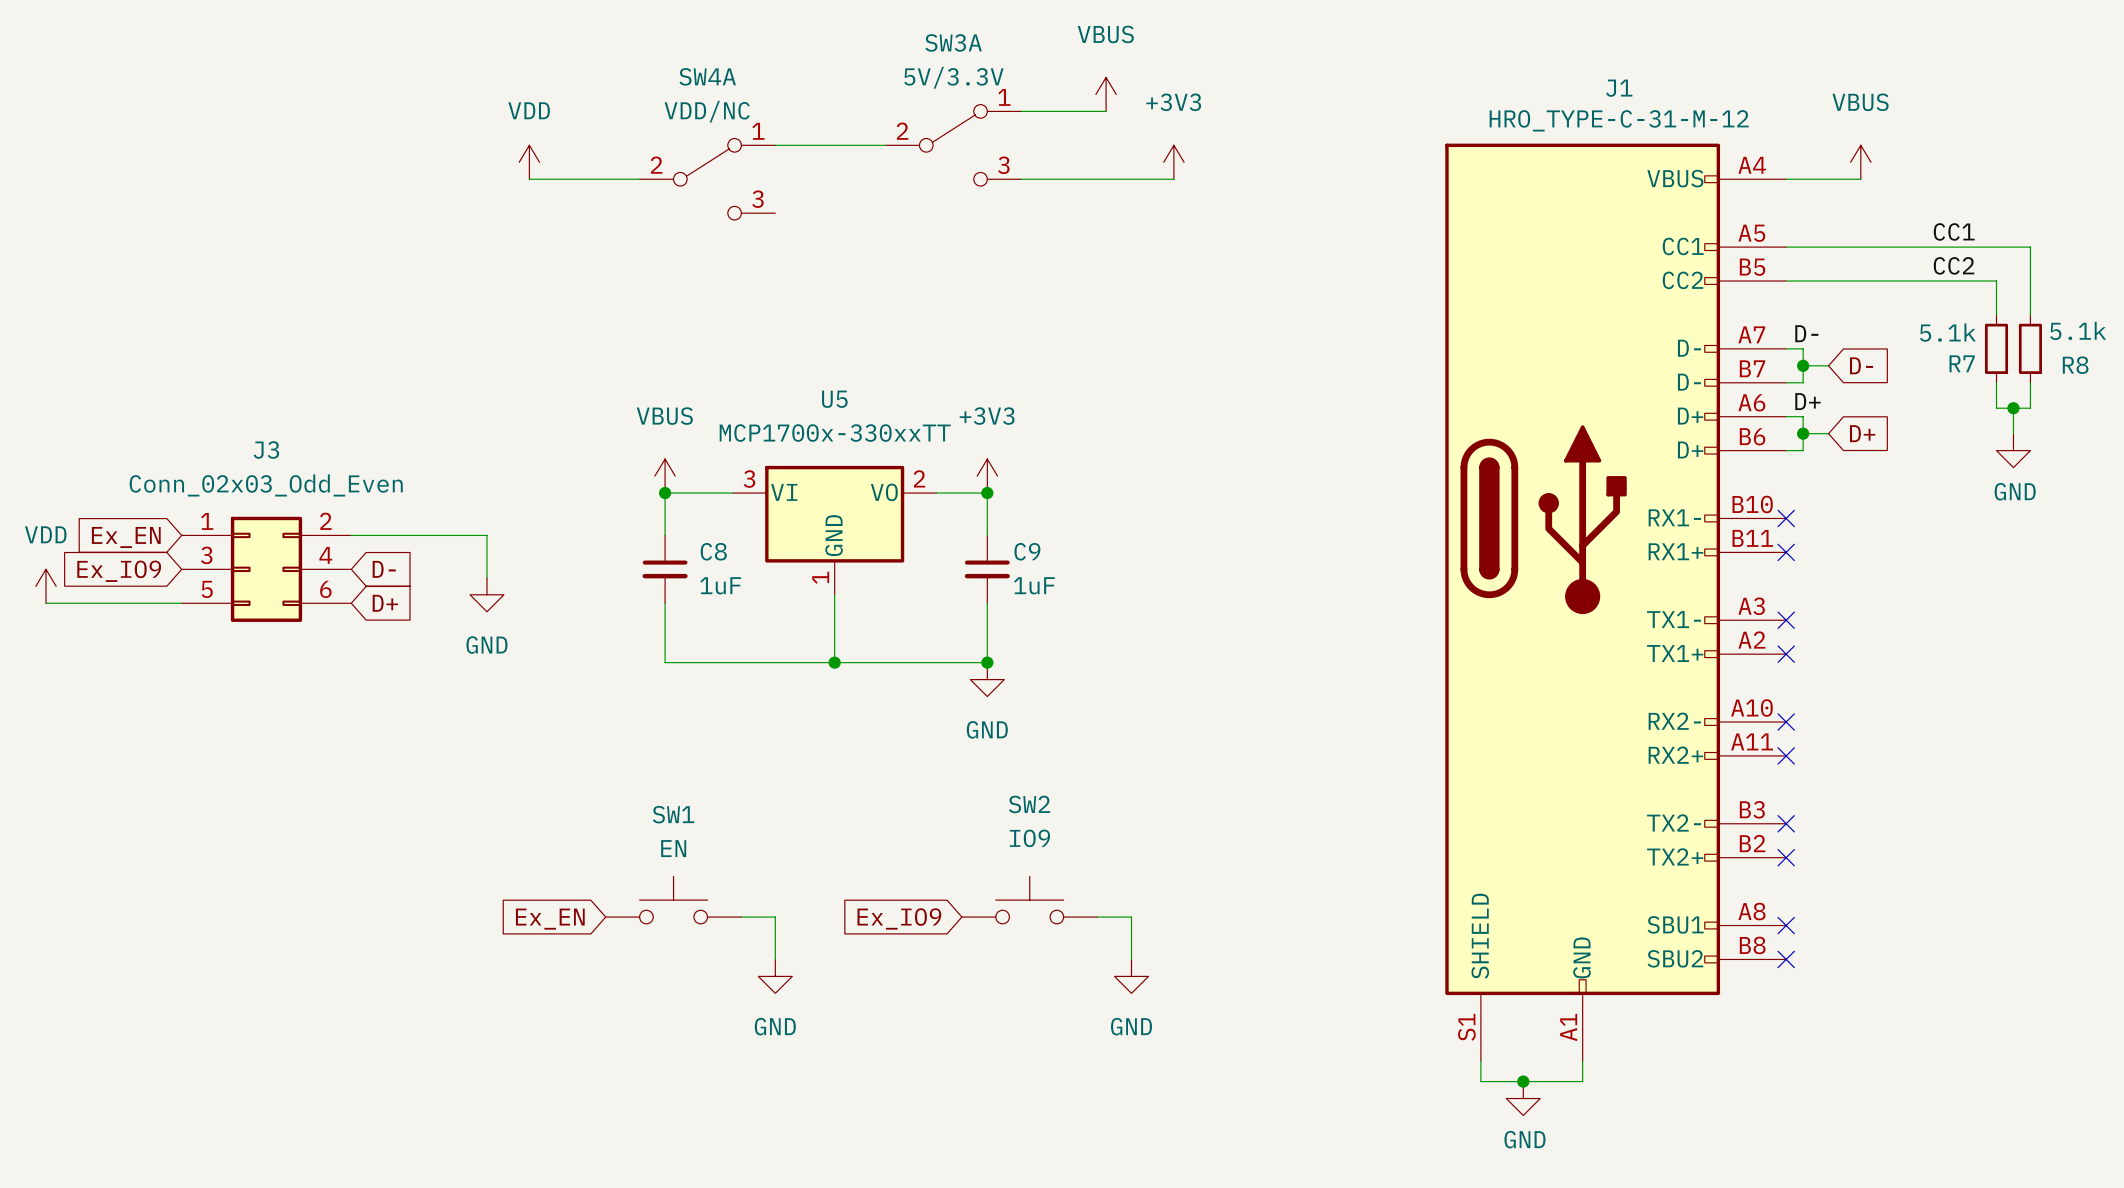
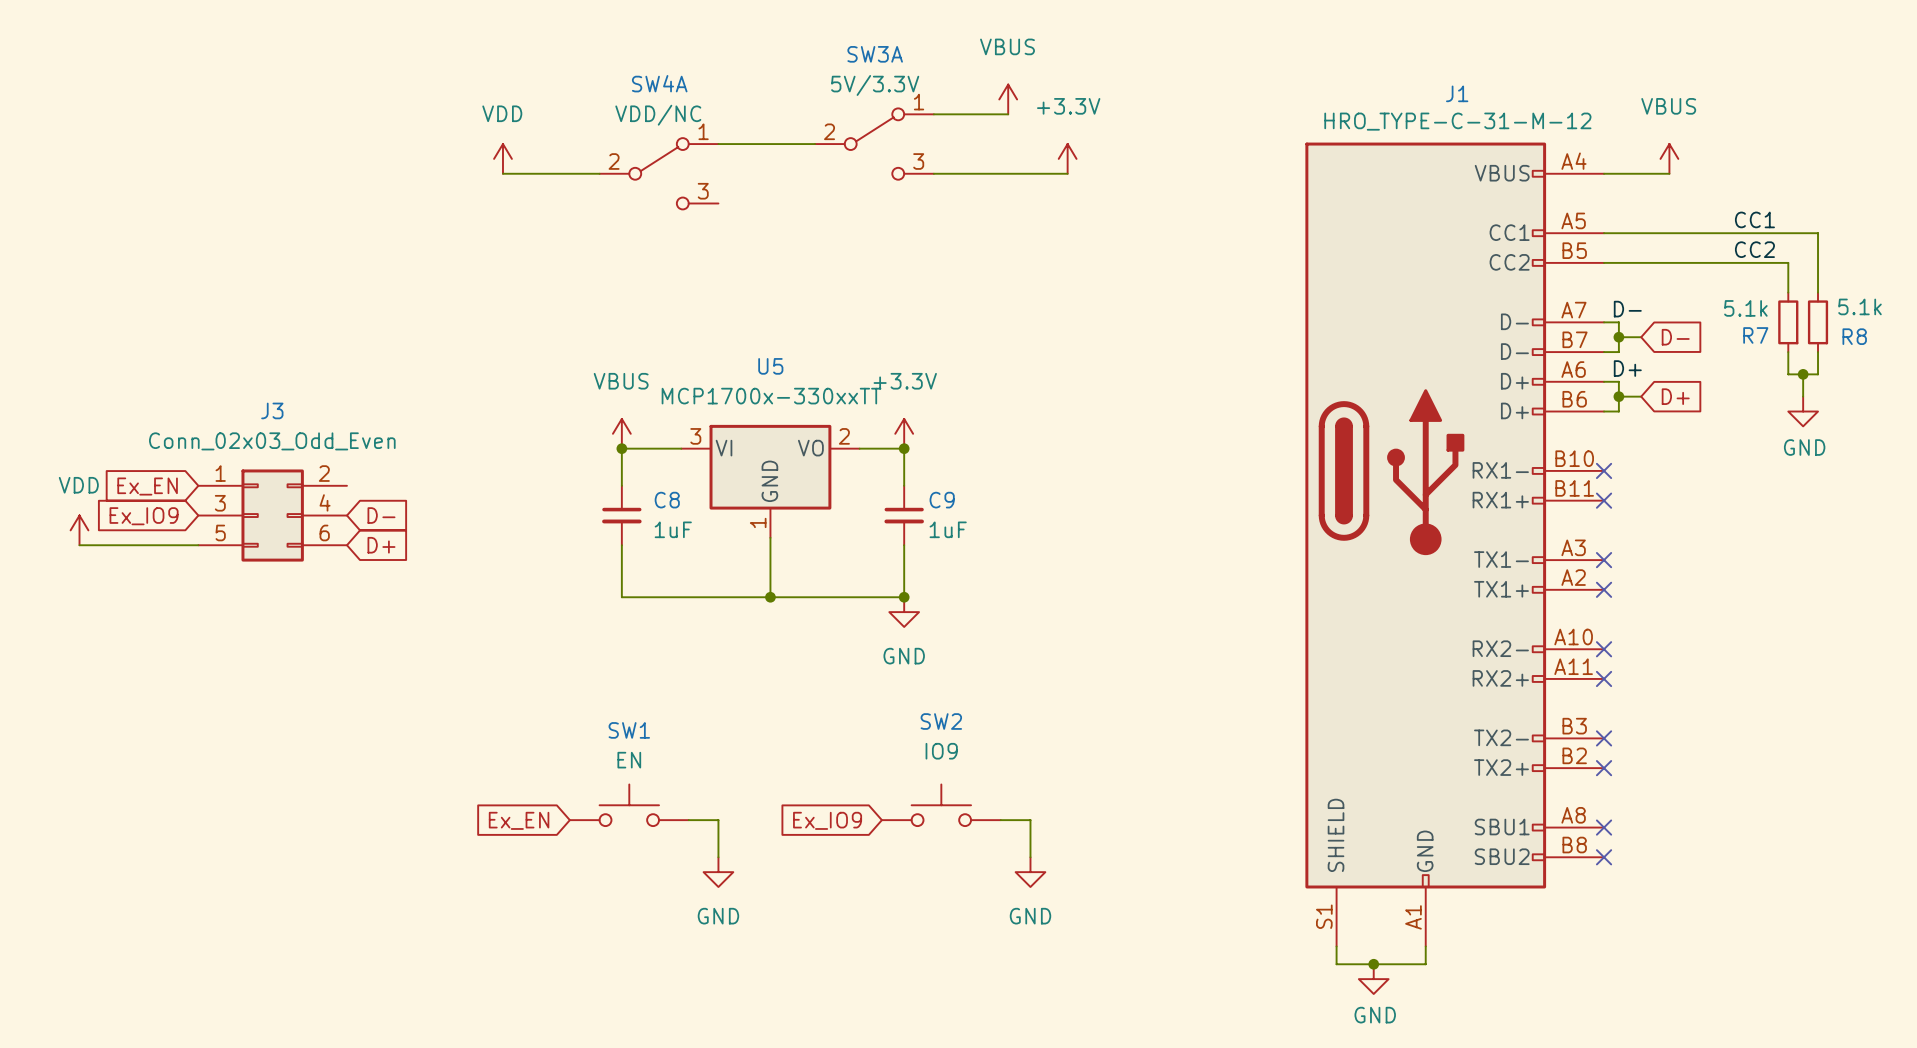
power symbol: +3V3 (1173, 162) -> +3.3V (1067, 158)
power symbol: +3V3 (987, 476) -> +3.3V (904, 433)
wire: (351, 535) (486, 535) (486, 577) -> none
power symbol: GND (486, 594) -> none

